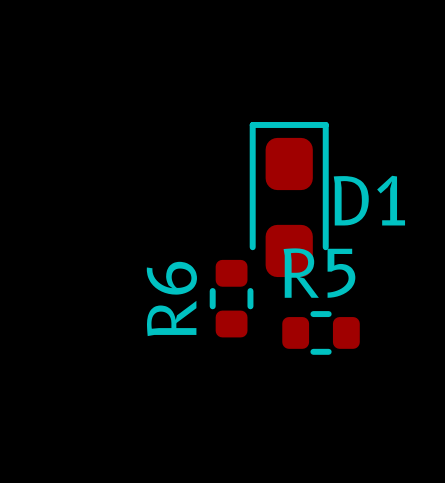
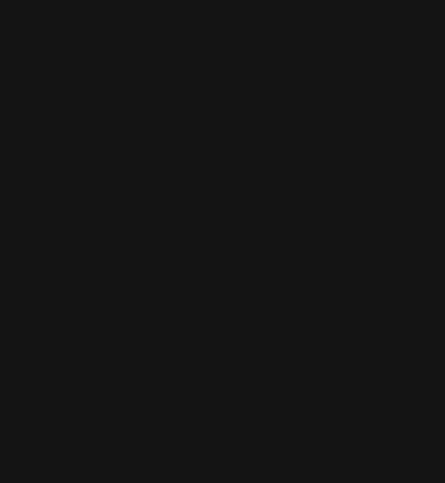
D1: (289, 199) -> none
R6: (231, 298) -> none
R5: (321, 332) -> none

